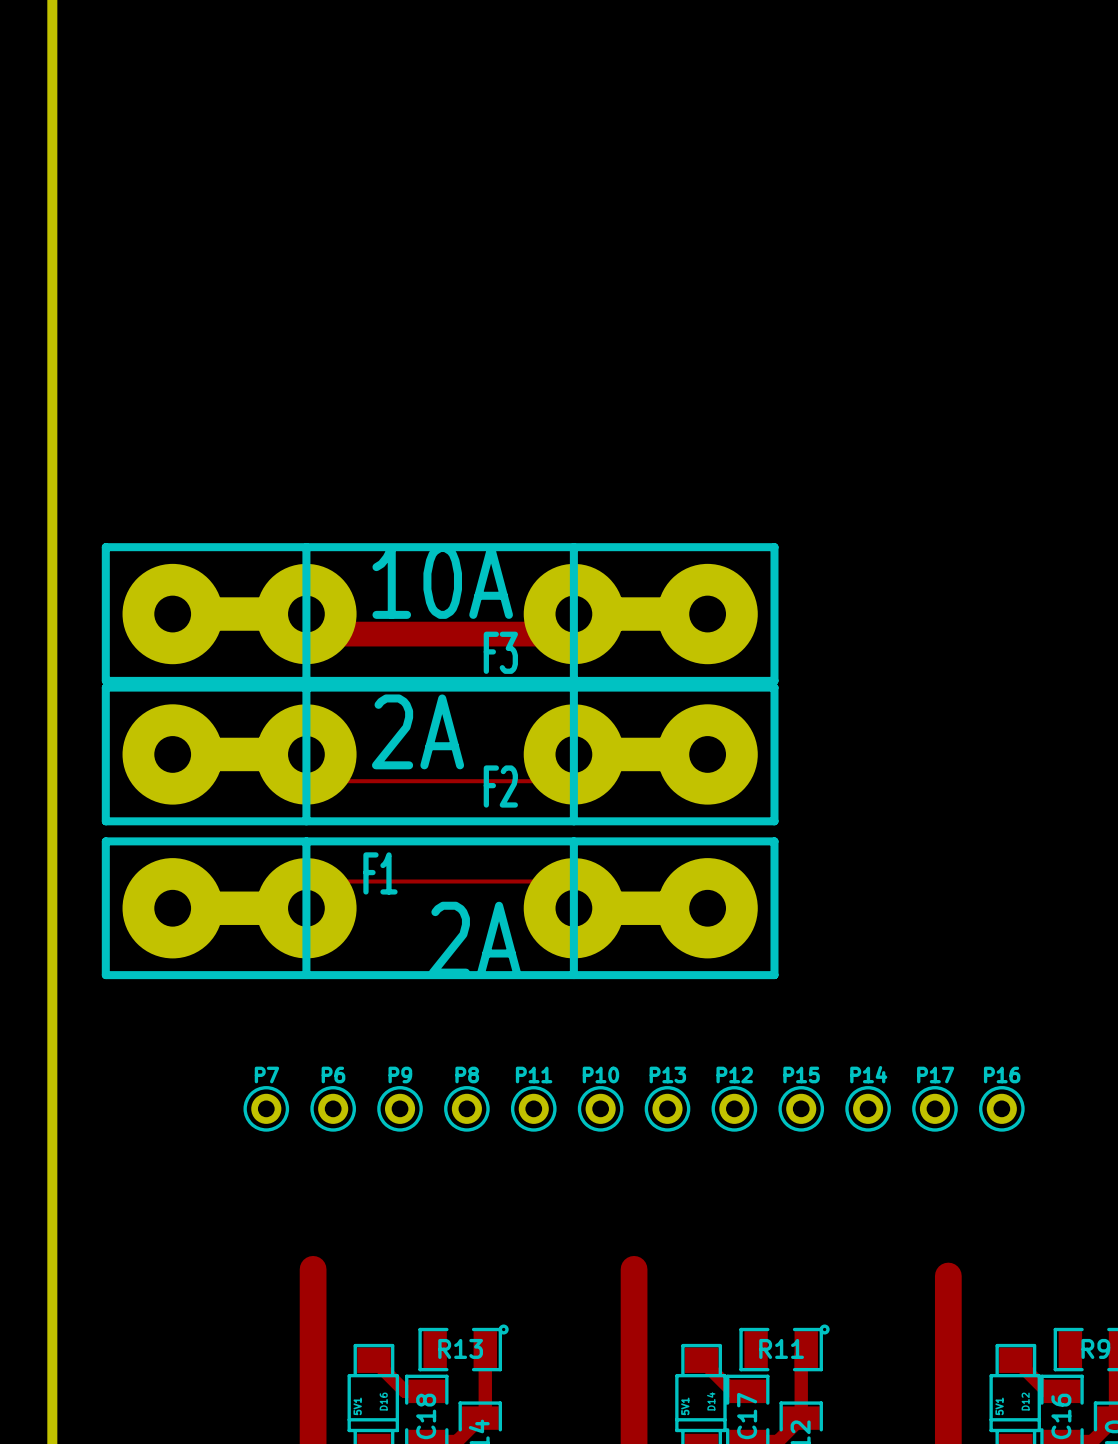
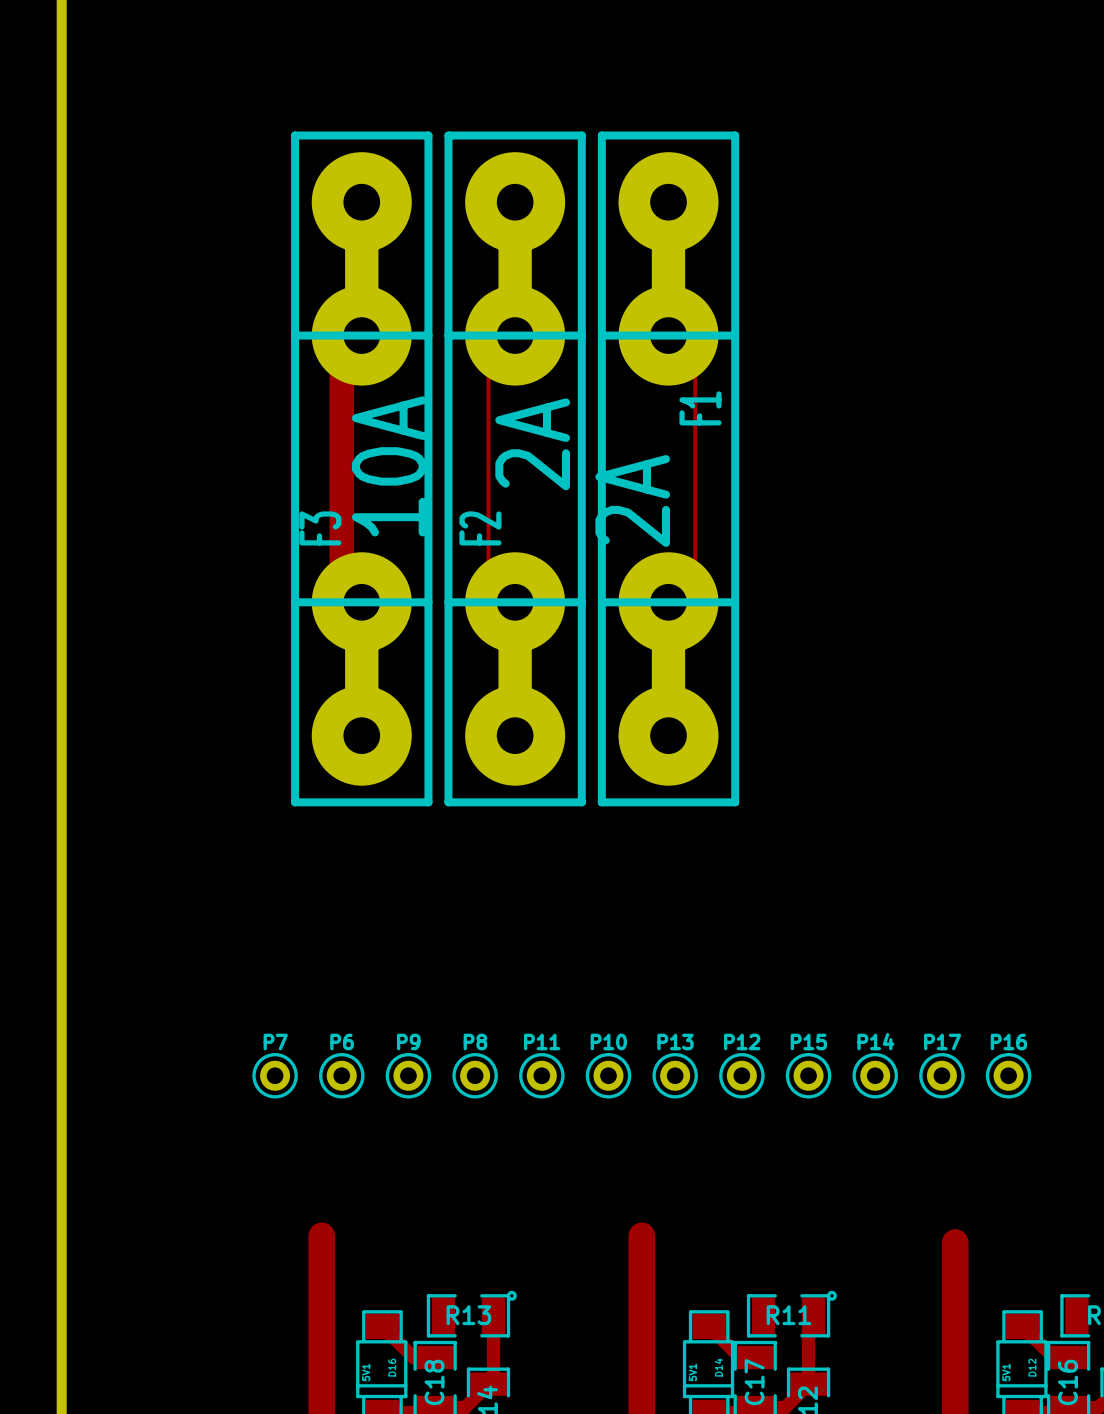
F3 rotation: 0° (440, 614) -> 90° clockwise (361, 468)
F2 rotation: 0° (440, 754) -> 90° clockwise (515, 468)
F1 rotation: 0° (440, 908) -> 90° clockwise (668, 468)
F1 position: (440, 908) -> (668, 468)

